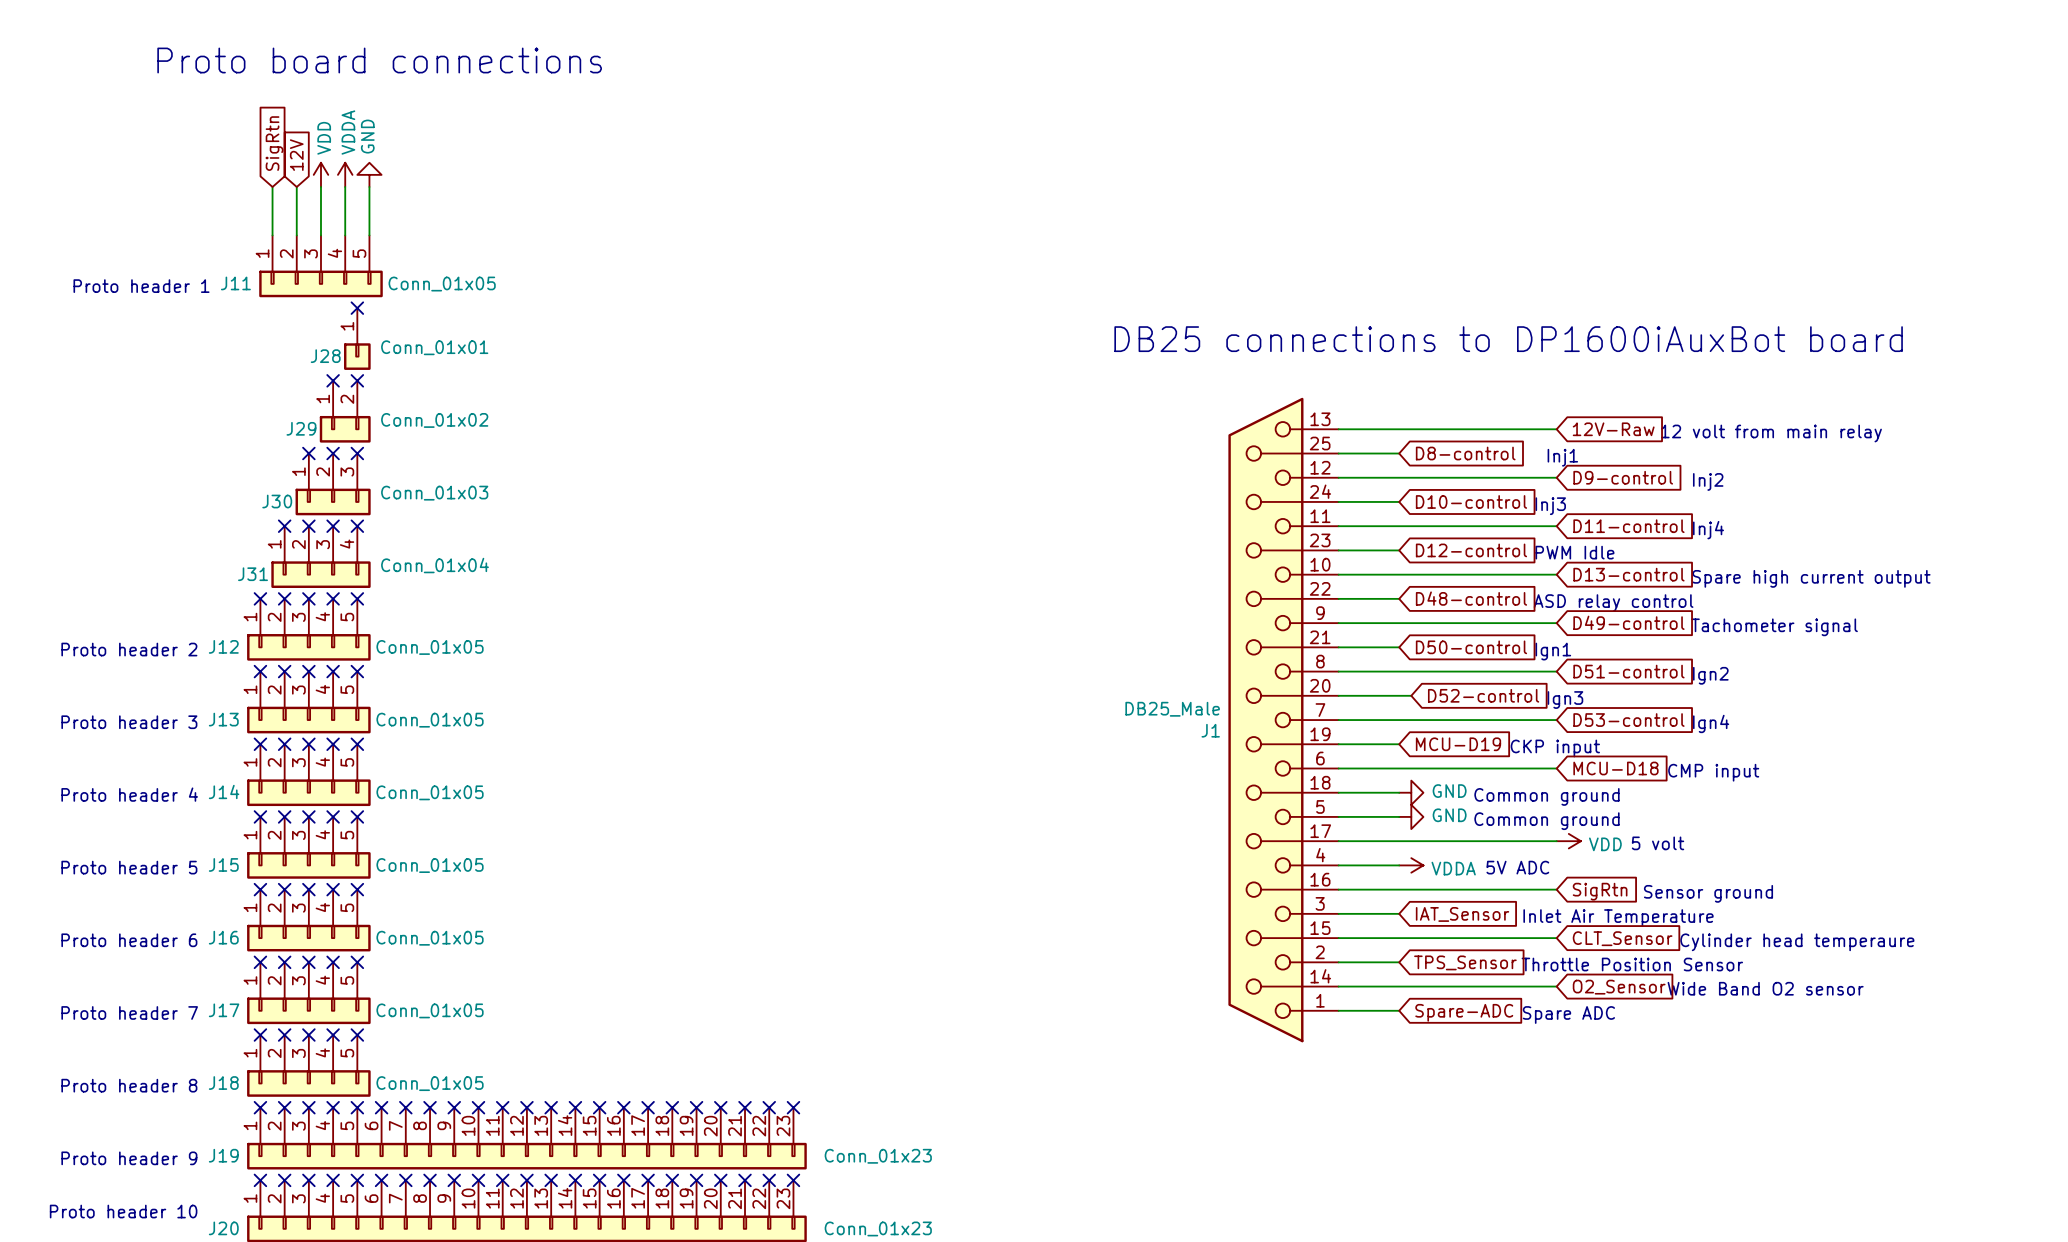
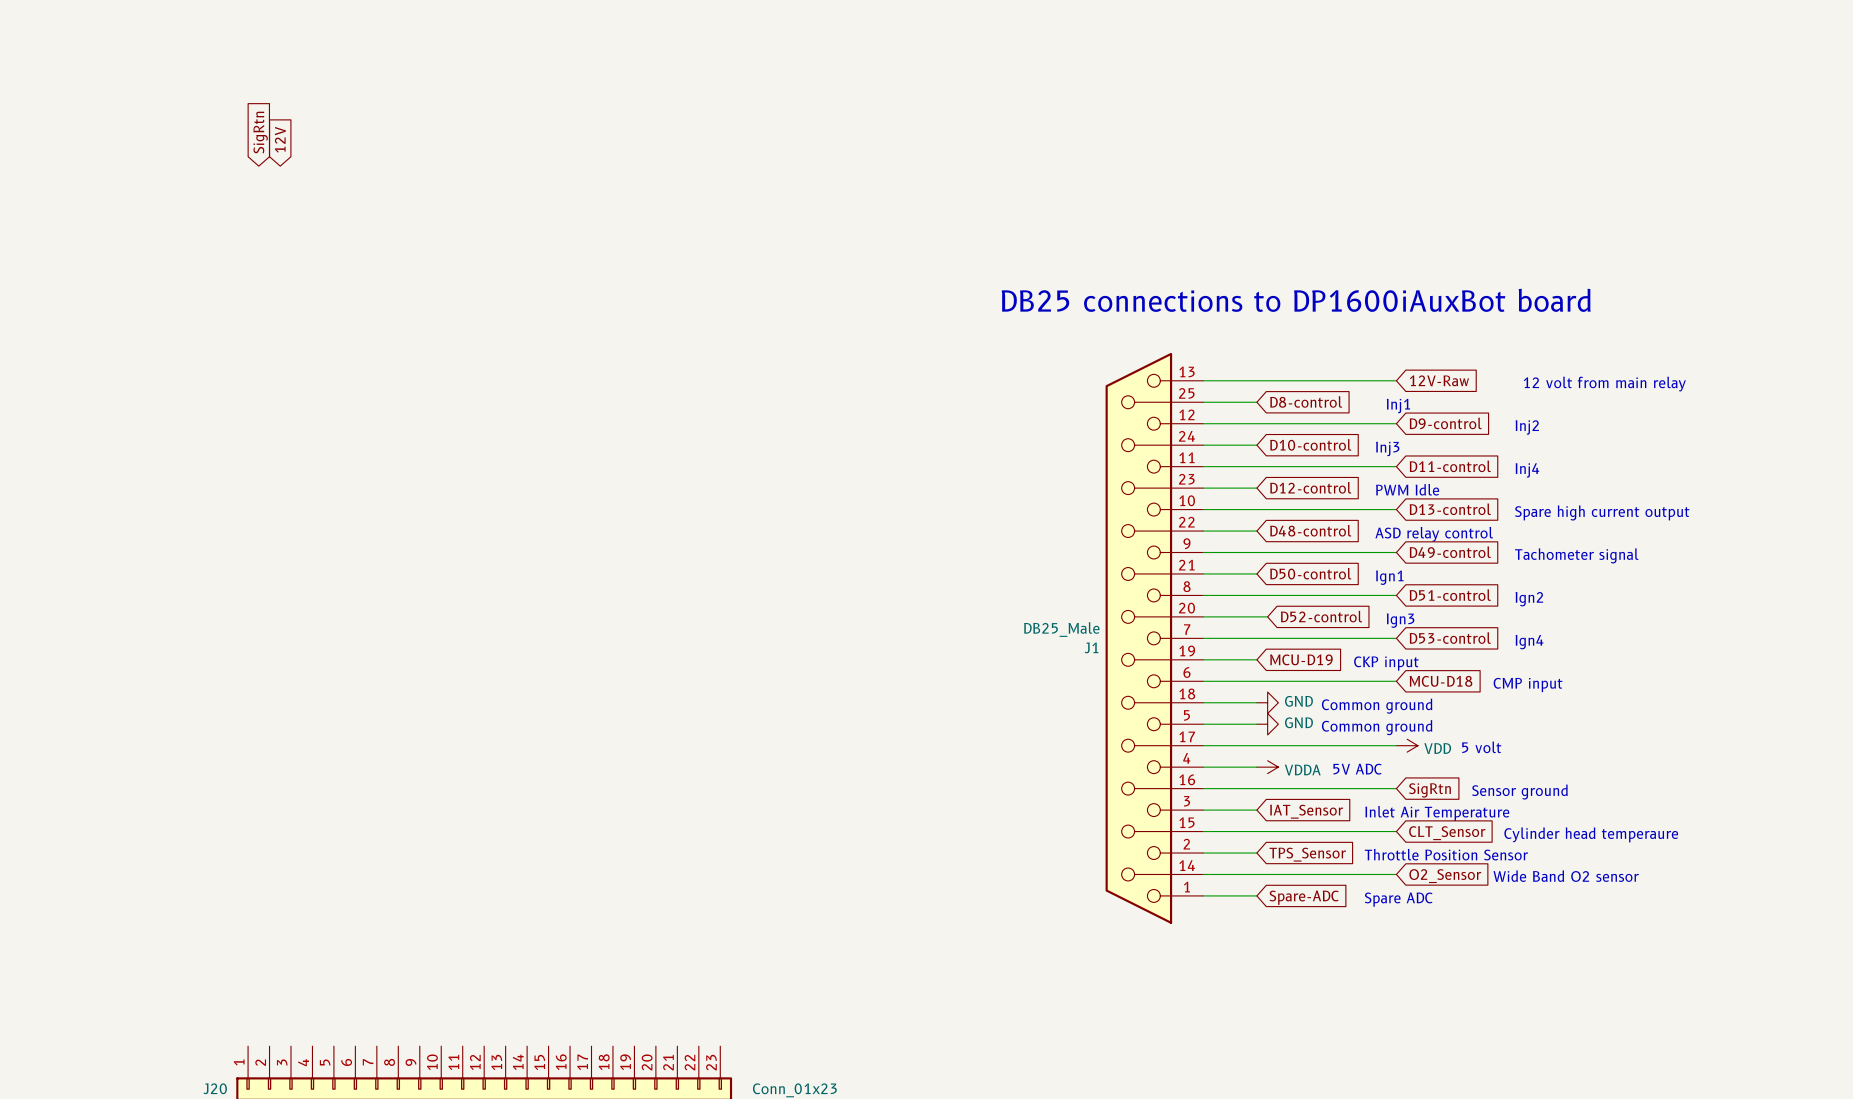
text: Proto board connections (379, 60) -> none
power symbol: VDD (320, 174) -> none
power symbol: VDDA (345, 174) -> none
power symbol: GND (369, 174) -> none
wire: (272, 186) (272, 235) -> none
wire: (296, 186) (296, 235) -> none
wire: (320, 186) (320, 235) -> none
wire: (345, 186) (345, 235) -> none
wire: (369, 186) (369, 235) -> none
J11: Conn_01x05 (320, 266) -> none
text: Proto header 1 (141, 286) -> none
no-connect mark: (357, 308) -> none
J28: Conn_01x01 (357, 339) -> none
no-connect mark: (333, 380) -> none
no-connect mark: (357, 380) -> none
J29: Conn_01x02 (345, 411) -> none
no-connect mark: (308, 453) -> none
no-connect mark: (333, 453) -> none
no-connect mark: (357, 453) -> none
J30: Conn_01x03 (333, 484) -> none
no-connect mark: (284, 526) -> none
no-connect mark: (308, 526) -> none
no-connect mark: (333, 526) -> none
no-connect mark: (357, 526) -> none
J31: Conn_01x04 (320, 557) -> none
no-connect mark: (260, 598) -> none
no-connect mark: (284, 598) -> none
no-connect mark: (308, 598) -> none
no-connect mark: (333, 598) -> none
no-connect mark: (357, 598) -> none
J12: Conn_01x05 (308, 629) -> none
text: Proto header 2 (129, 649) -> none
no-connect mark: (260, 671) -> none
no-connect mark: (284, 671) -> none
no-connect mark: (308, 671) -> none
no-connect mark: (333, 671) -> none
no-connect mark: (357, 671) -> none
J13: Conn_01x05 (308, 702) -> none
text: Proto header 3 (129, 722) -> none
no-connect mark: (260, 744) -> none
no-connect mark: (284, 744) -> none
no-connect mark: (308, 744) -> none
no-connect mark: (333, 744) -> none
no-connect mark: (357, 744) -> none
J14: Conn_01x05 (308, 775) -> none
text: Proto header 4 (129, 794) -> none
no-connect mark: (260, 816) -> none
no-connect mark: (284, 816) -> none
no-connect mark: (308, 816) -> none
no-connect mark: (333, 816) -> none
no-connect mark: (357, 816) -> none
J15: Conn_01x05 (308, 847) -> none
text: Proto header 5 (129, 867) -> none
no-connect mark: (260, 889) -> none
no-connect mark: (284, 889) -> none
no-connect mark: (308, 889) -> none
no-connect mark: (333, 889) -> none
no-connect mark: (357, 889) -> none
J16: Conn_01x05 (308, 920) -> none
text: Proto header 6 (129, 940) -> none
no-connect mark: (260, 962) -> none
no-connect mark: (284, 962) -> none
no-connect mark: (308, 962) -> none
no-connect mark: (333, 962) -> none
no-connect mark: (357, 962) -> none
J17: Conn_01x05 (308, 993) -> none
text: Proto header 7 (129, 1012) -> none
no-connect mark: (260, 1035) -> none
no-connect mark: (284, 1035) -> none
no-connect mark: (308, 1035) -> none
no-connect mark: (333, 1035) -> none
no-connect mark: (357, 1035) -> none
J18: Conn_01x05 (308, 1065) -> none
text: Proto header 8 (129, 1085) -> none
no-connect mark: (260, 1107) -> none
no-connect mark: (284, 1107) -> none
no-connect mark: (308, 1107) -> none
no-connect mark: (333, 1107) -> none
no-connect mark: (357, 1107) -> none
no-connect mark: (381, 1107) -> none
no-connect mark: (405, 1107) -> none
no-connect mark: (430, 1107) -> none
no-connect mark: (454, 1107) -> none
no-connect mark: (478, 1107) -> none
no-connect mark: (502, 1107) -> none
no-connect mark: (526, 1107) -> none
no-connect mark: (551, 1107) -> none
no-connect mark: (575, 1107) -> none
no-connect mark: (599, 1107) -> none
no-connect mark: (623, 1107) -> none
no-connect mark: (648, 1107) -> none
no-connect mark: (672, 1107) -> none
no-connect mark: (696, 1107) -> none
no-connect mark: (720, 1107) -> none
no-connect mark: (745, 1107) -> none
no-connect mark: (769, 1107) -> none
no-connect mark: (793, 1107) -> none
J19: Conn_01x23 (526, 1138) -> none
text: Proto header 9 (129, 1158) -> none
no-connect mark: (260, 1180) -> none
no-connect mark: (284, 1180) -> none
no-connect mark: (308, 1180) -> none
no-connect mark: (333, 1180) -> none
no-connect mark: (357, 1180) -> none
no-connect mark: (381, 1180) -> none
no-connect mark: (405, 1180) -> none
no-connect mark: (430, 1180) -> none
no-connect mark: (454, 1180) -> none
no-connect mark: (478, 1180) -> none
no-connect mark: (502, 1180) -> none
no-connect mark: (526, 1180) -> none
no-connect mark: (551, 1180) -> none
no-connect mark: (575, 1180) -> none
no-connect mark: (599, 1180) -> none
no-connect mark: (623, 1180) -> none
no-connect mark: (648, 1180) -> none
no-connect mark: (672, 1180) -> none
no-connect mark: (696, 1180) -> none
no-connect mark: (720, 1180) -> none
no-connect mark: (745, 1180) -> none
no-connect mark: (769, 1180) -> none
no-connect mark: (793, 1180) -> none
text: Proto header 10 (123, 1211) -> none

